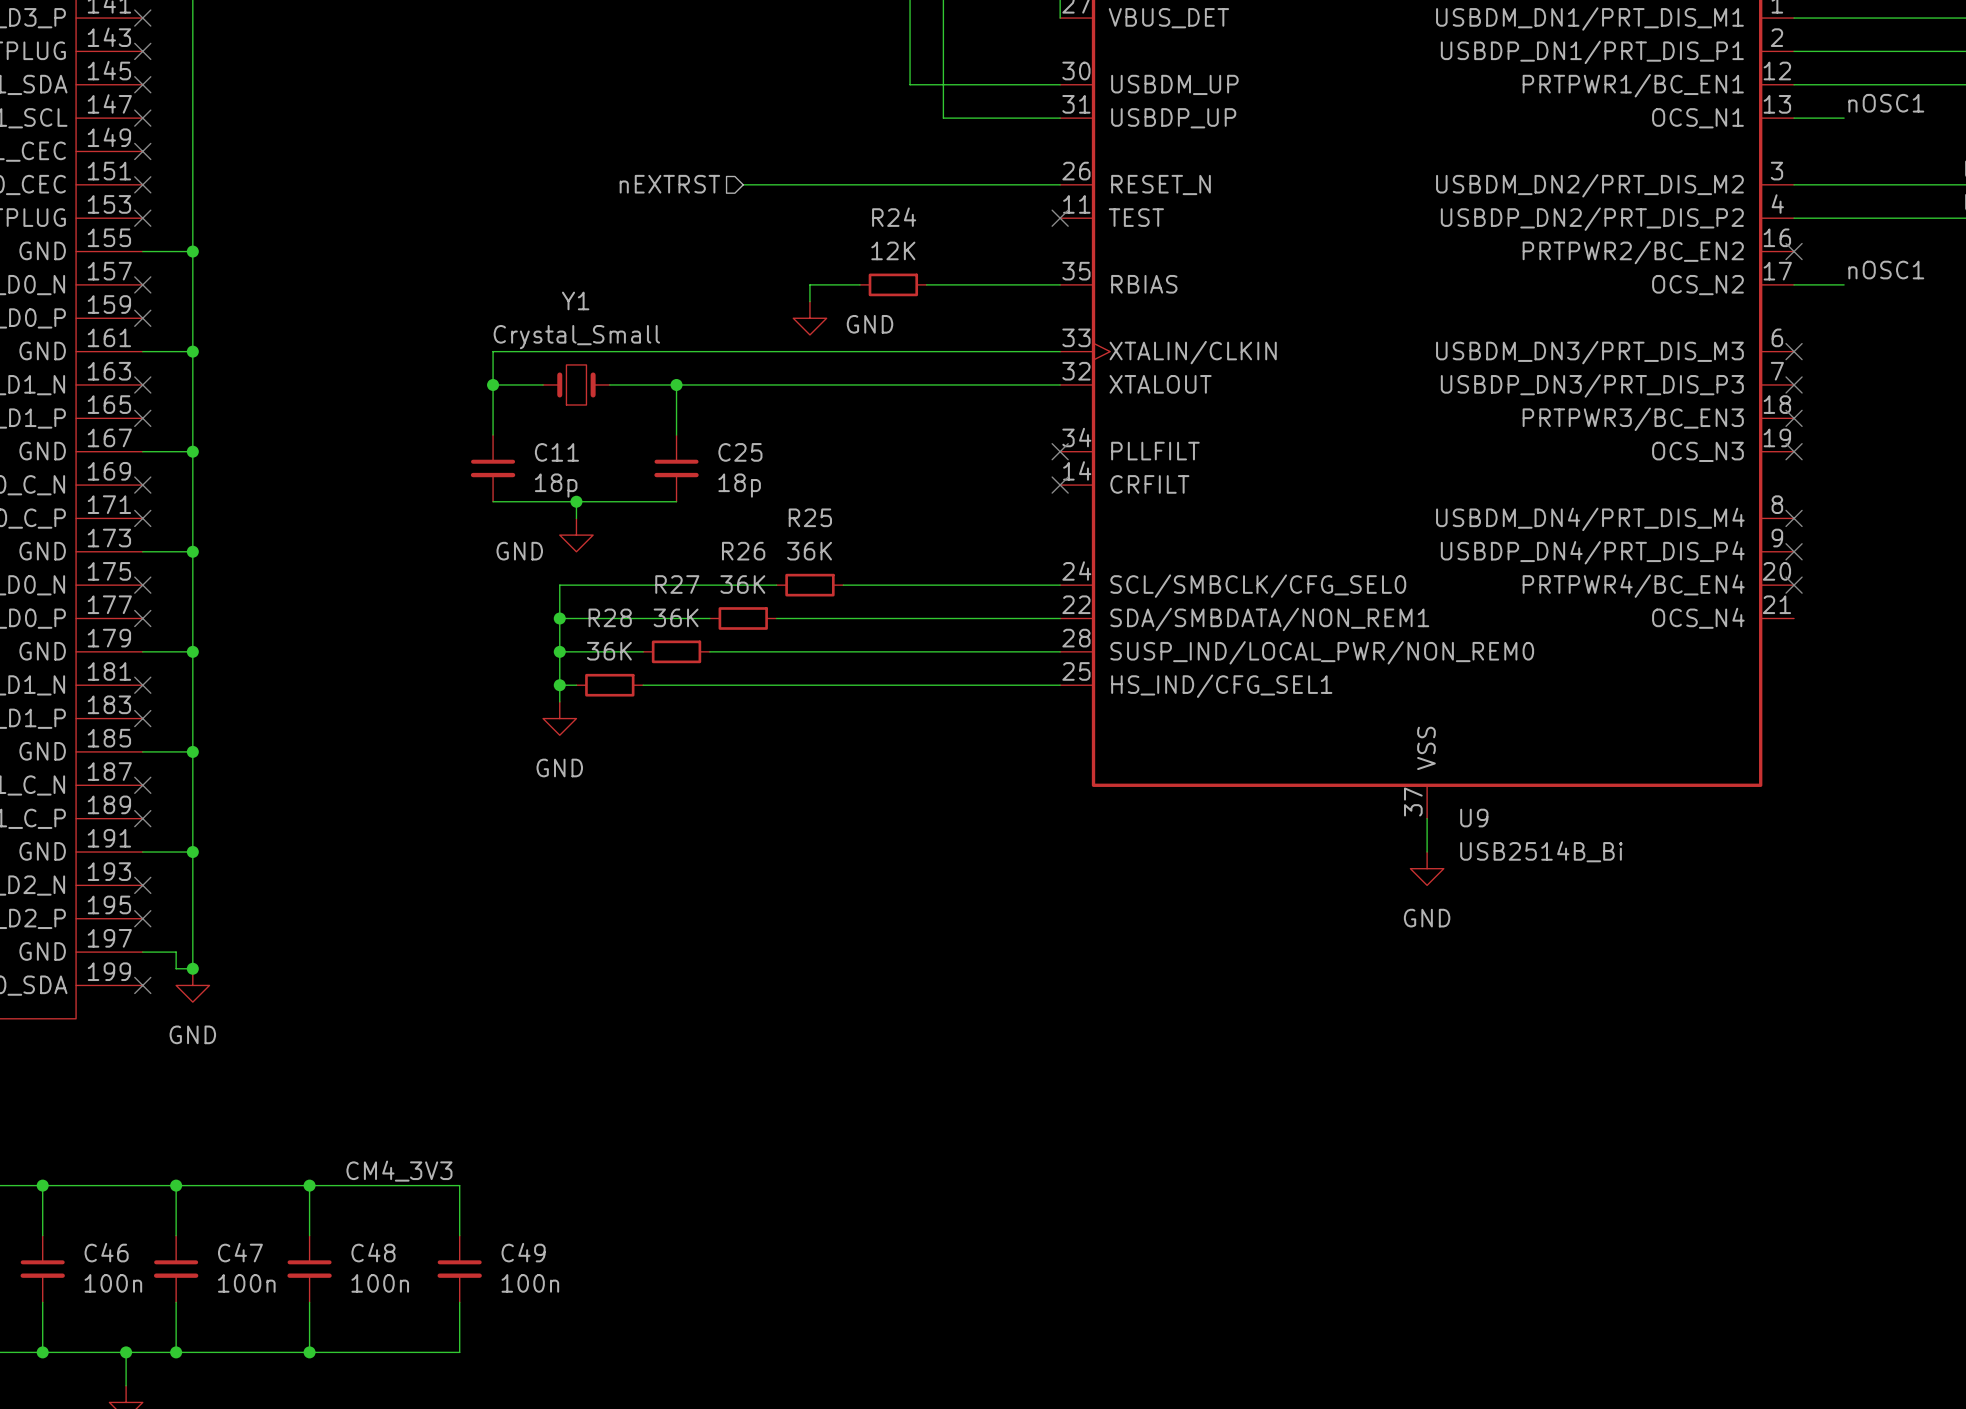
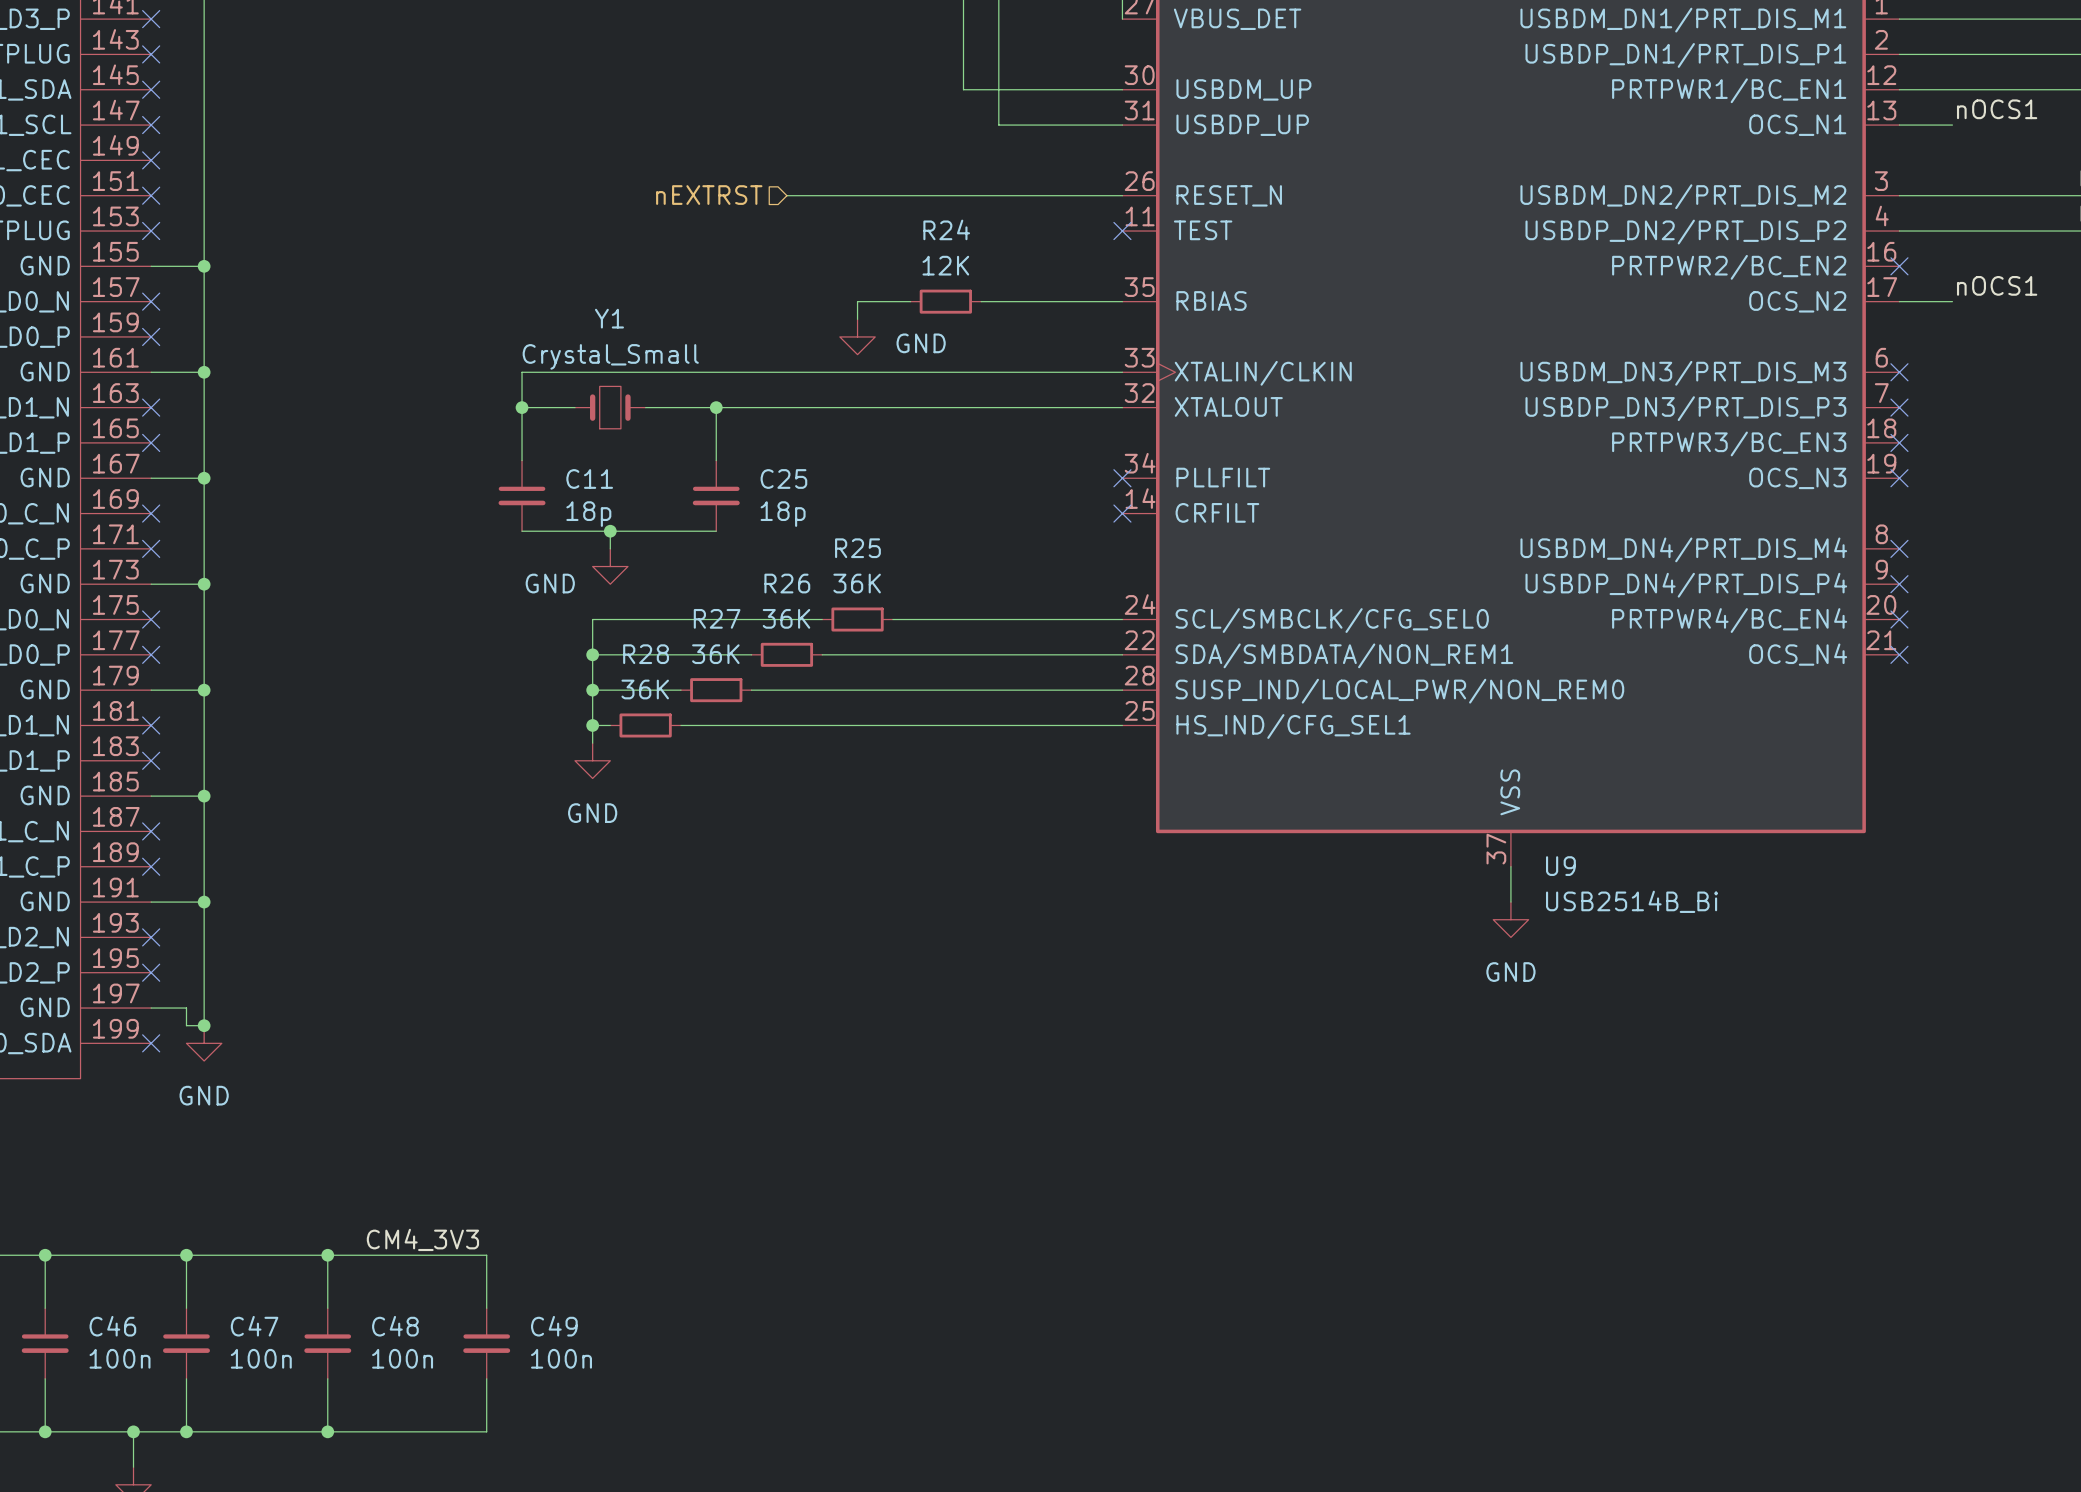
label: nOSC1 (1886, 103) -> nOCS1 (1997, 109)
label: nOSC1 (1886, 270) -> nOCS1 (1997, 285)
no-connect mark: none -> (1899, 654)

